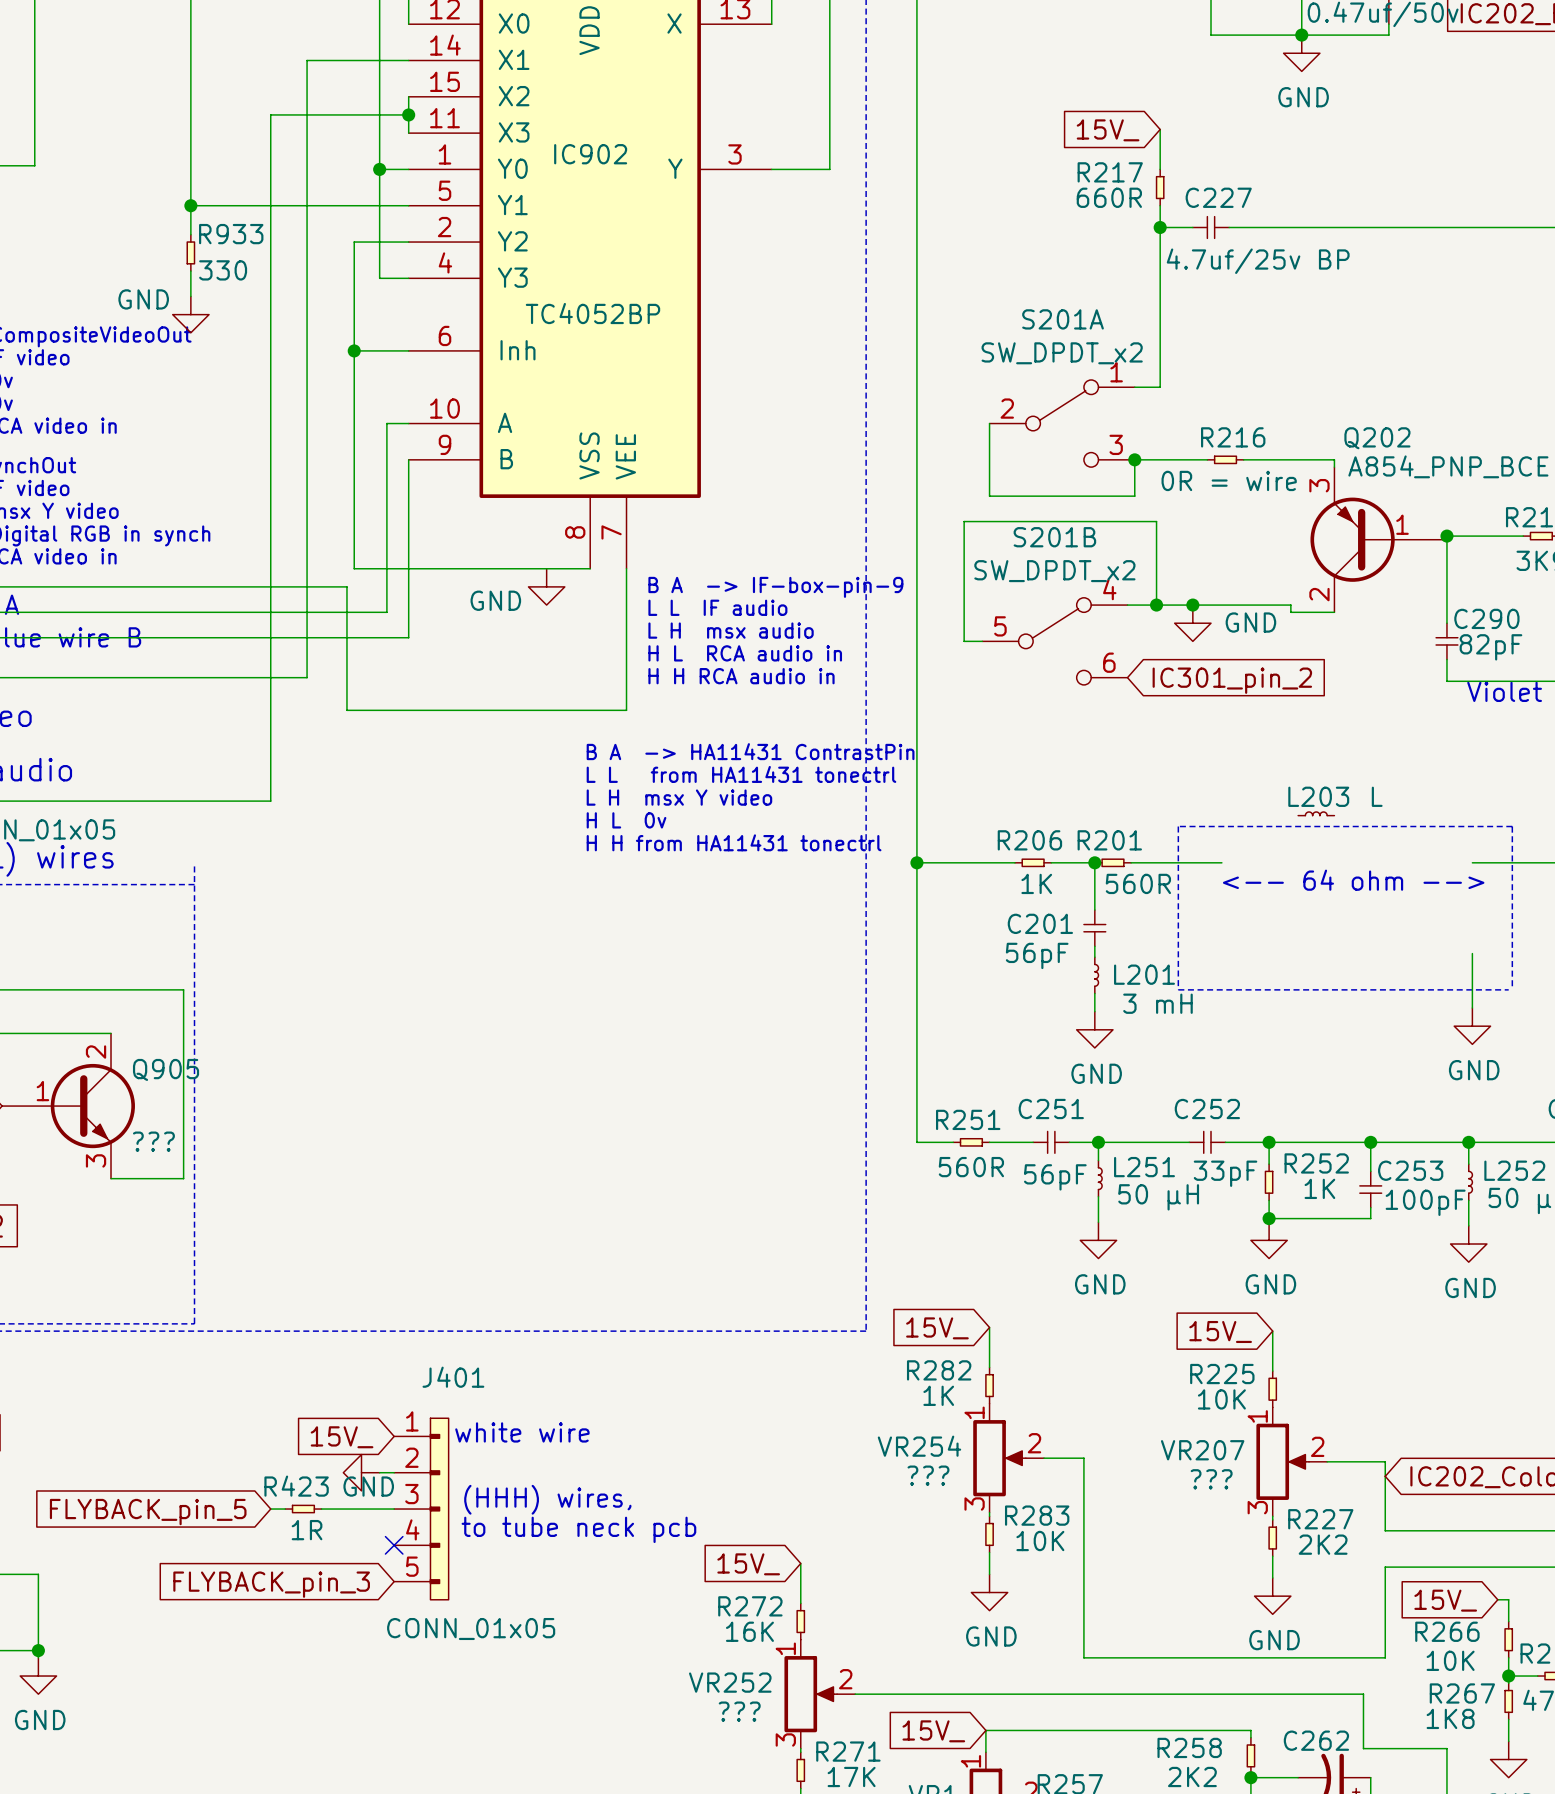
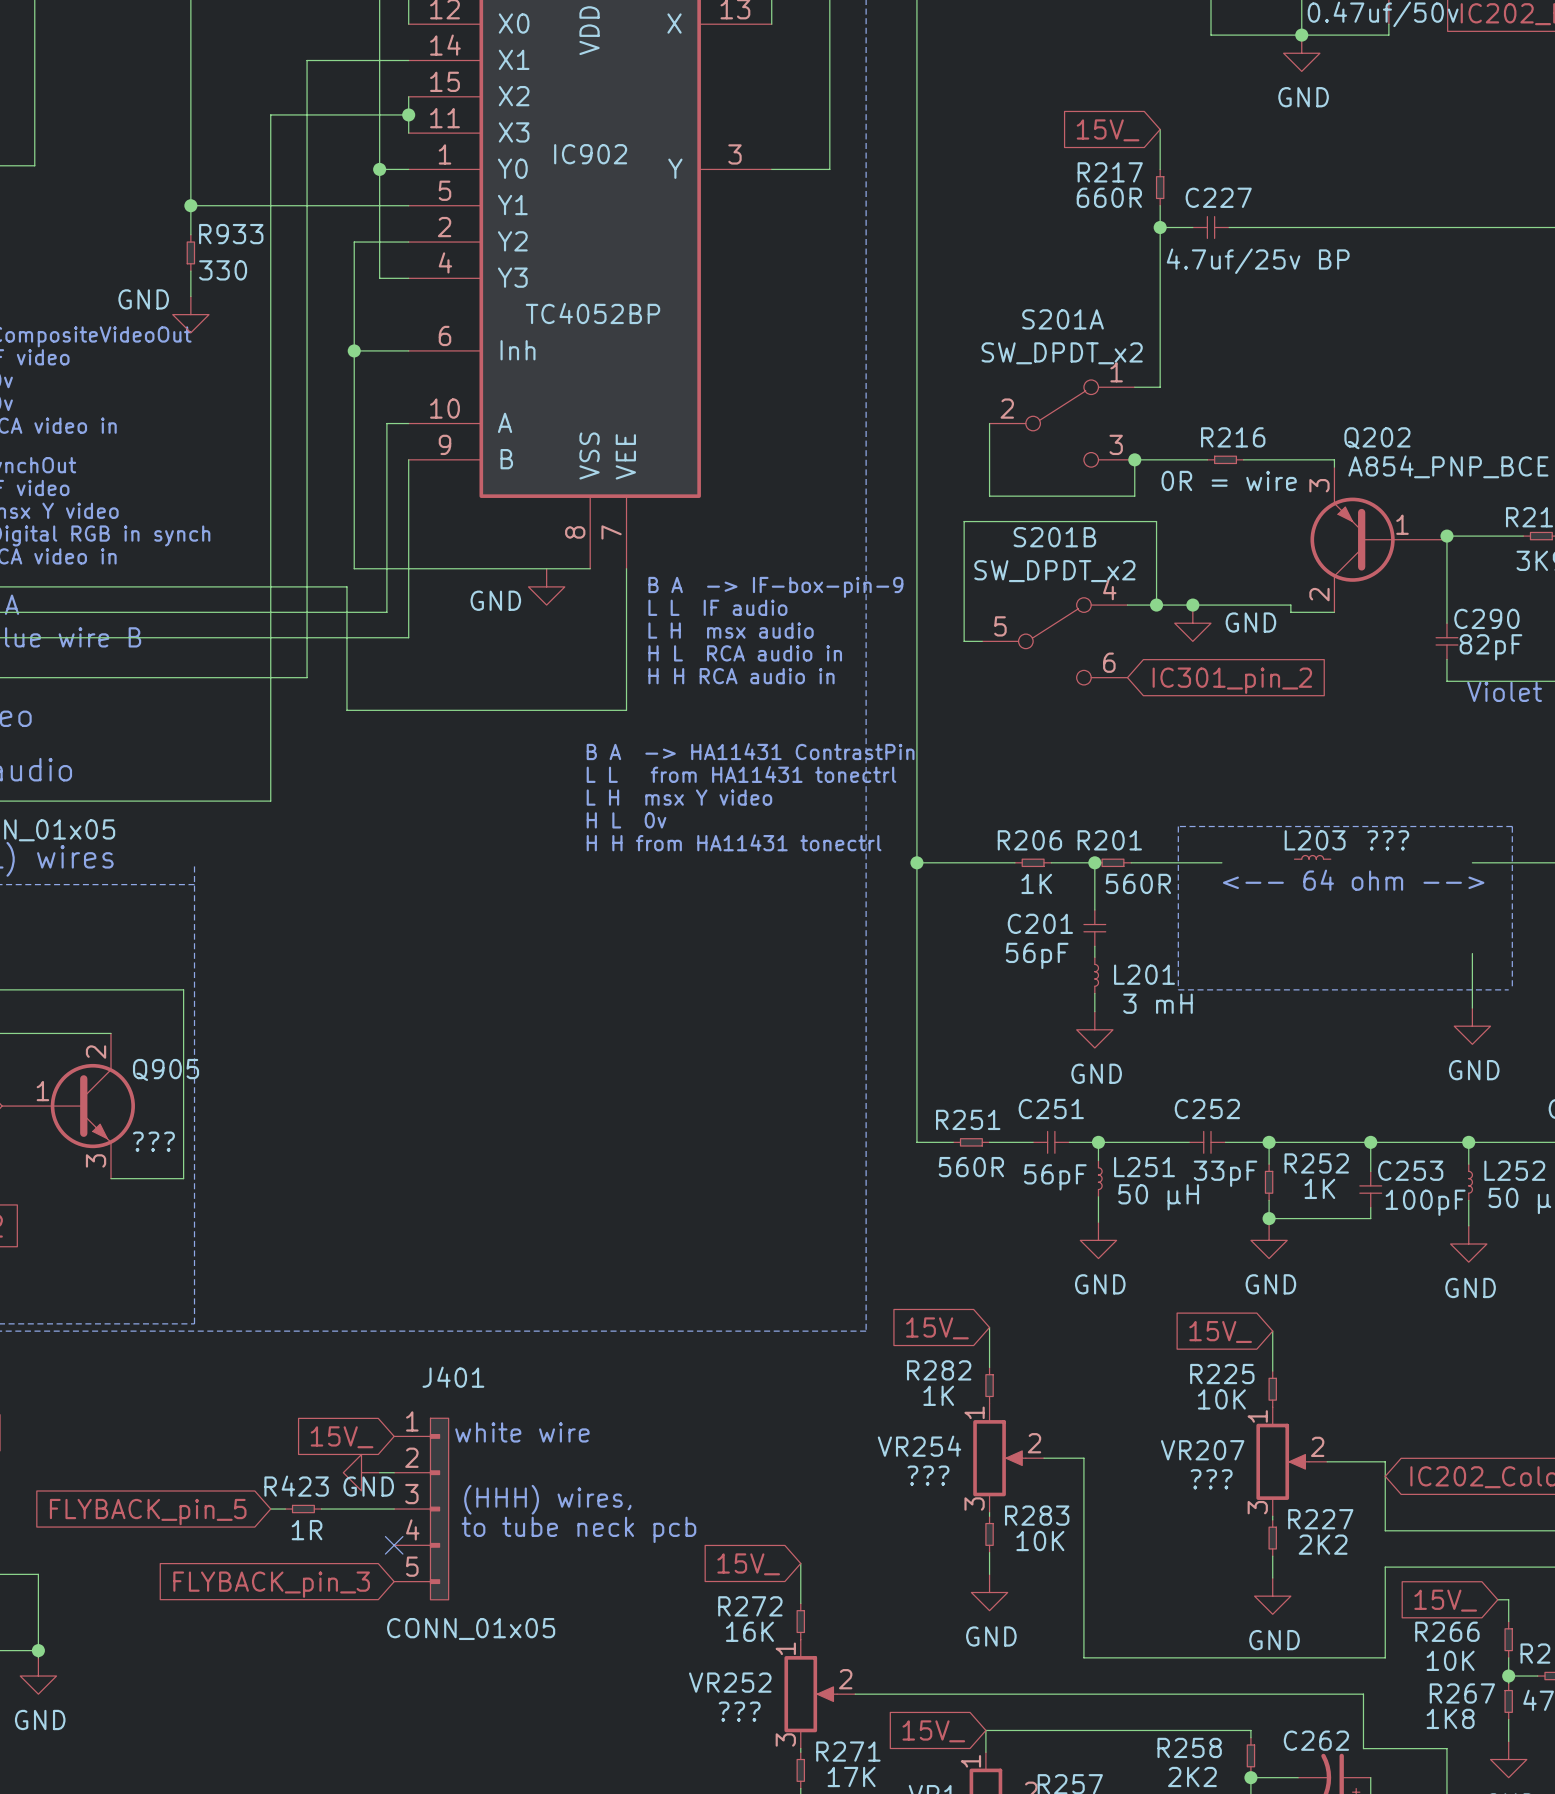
L203 value: L (1377, 796) -> ??? (1388, 840)
L203 position: (1316, 813) -> (1312, 857)

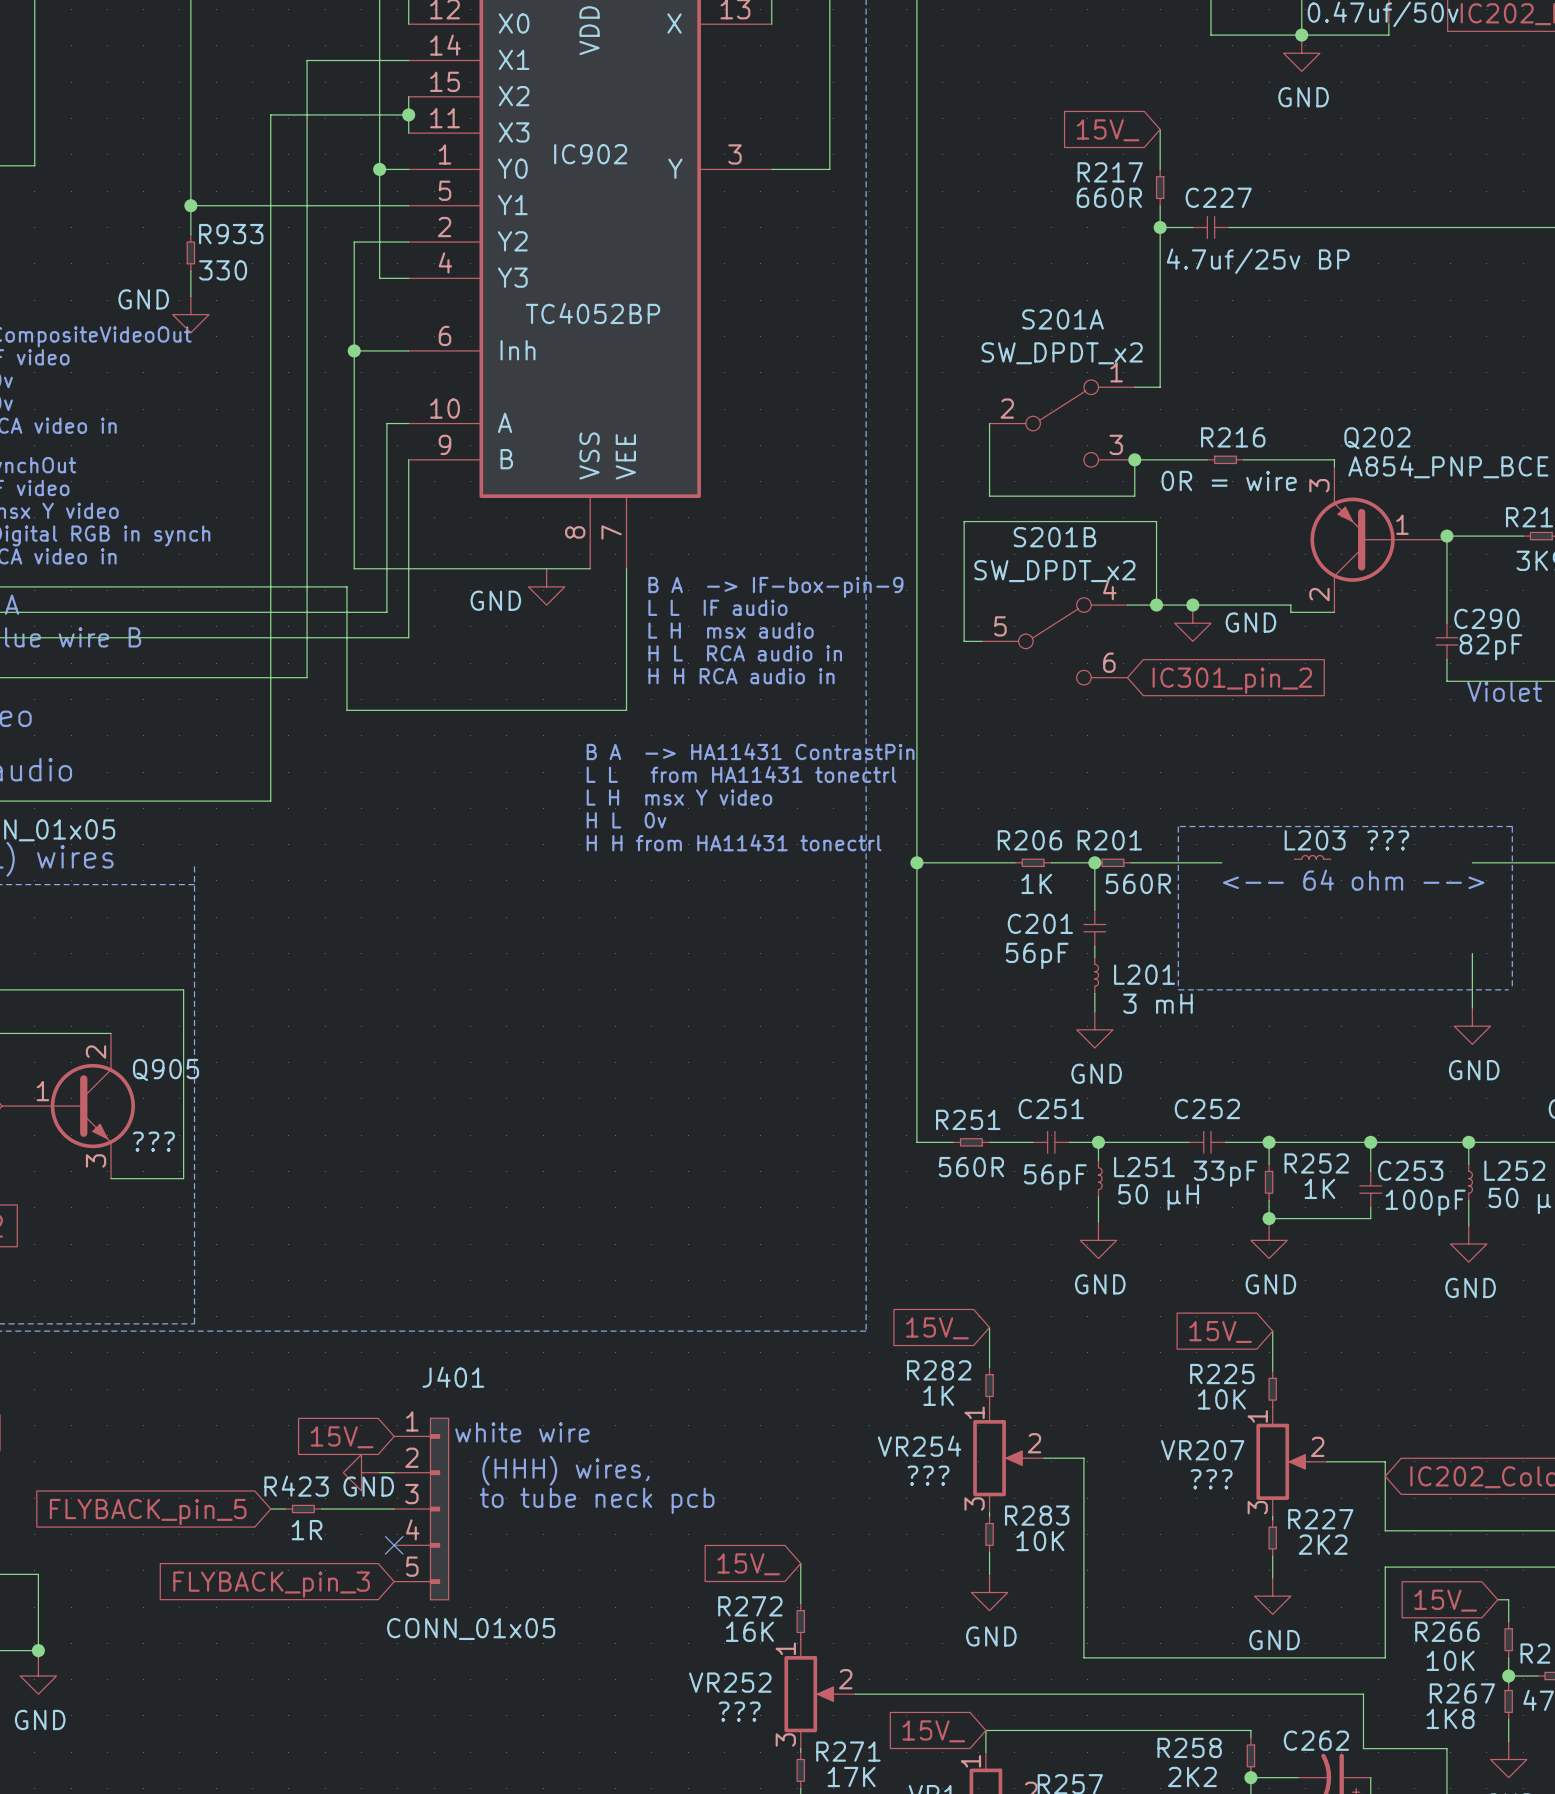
text position: (HHH) wires, (547, 1499) -> (HHH) wires, (565, 1470)
text position: to tube neck pcb (578, 1529) -> to tube neck pcb (597, 1500)

